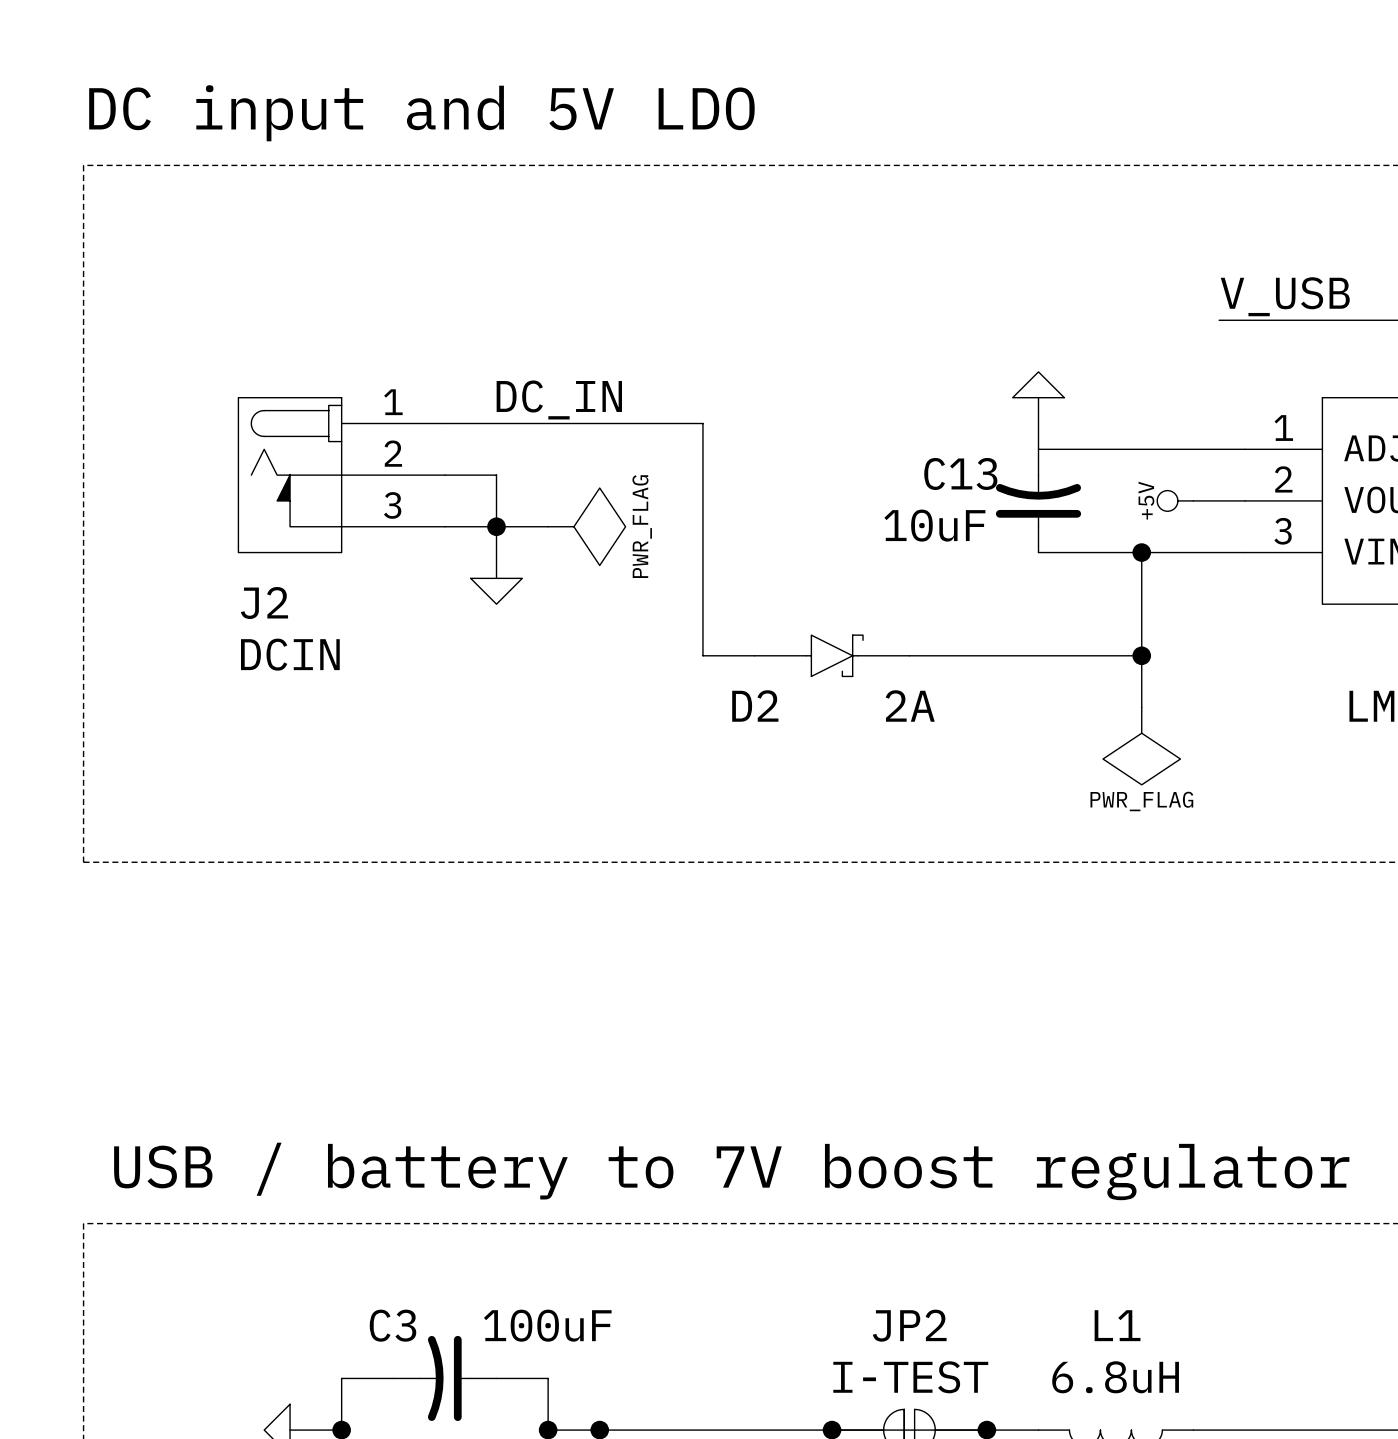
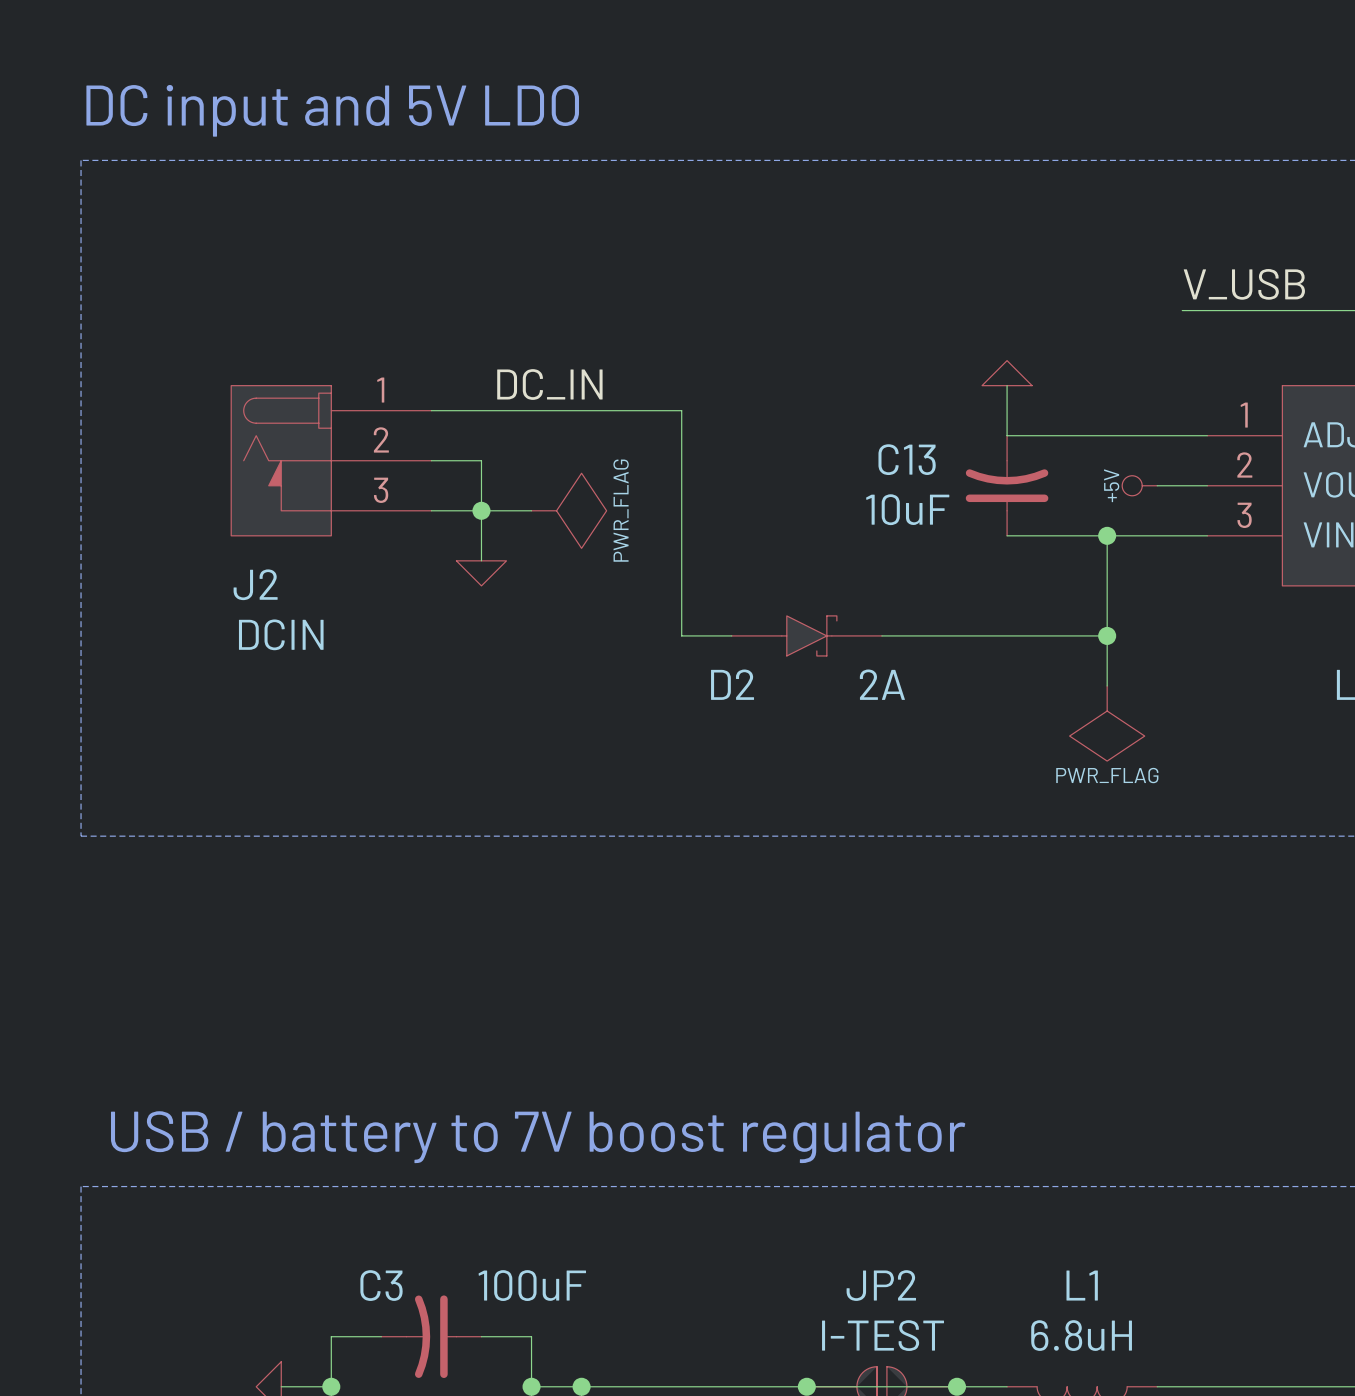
C13 name position: C13 (960, 473) -> C13 (907, 459)

